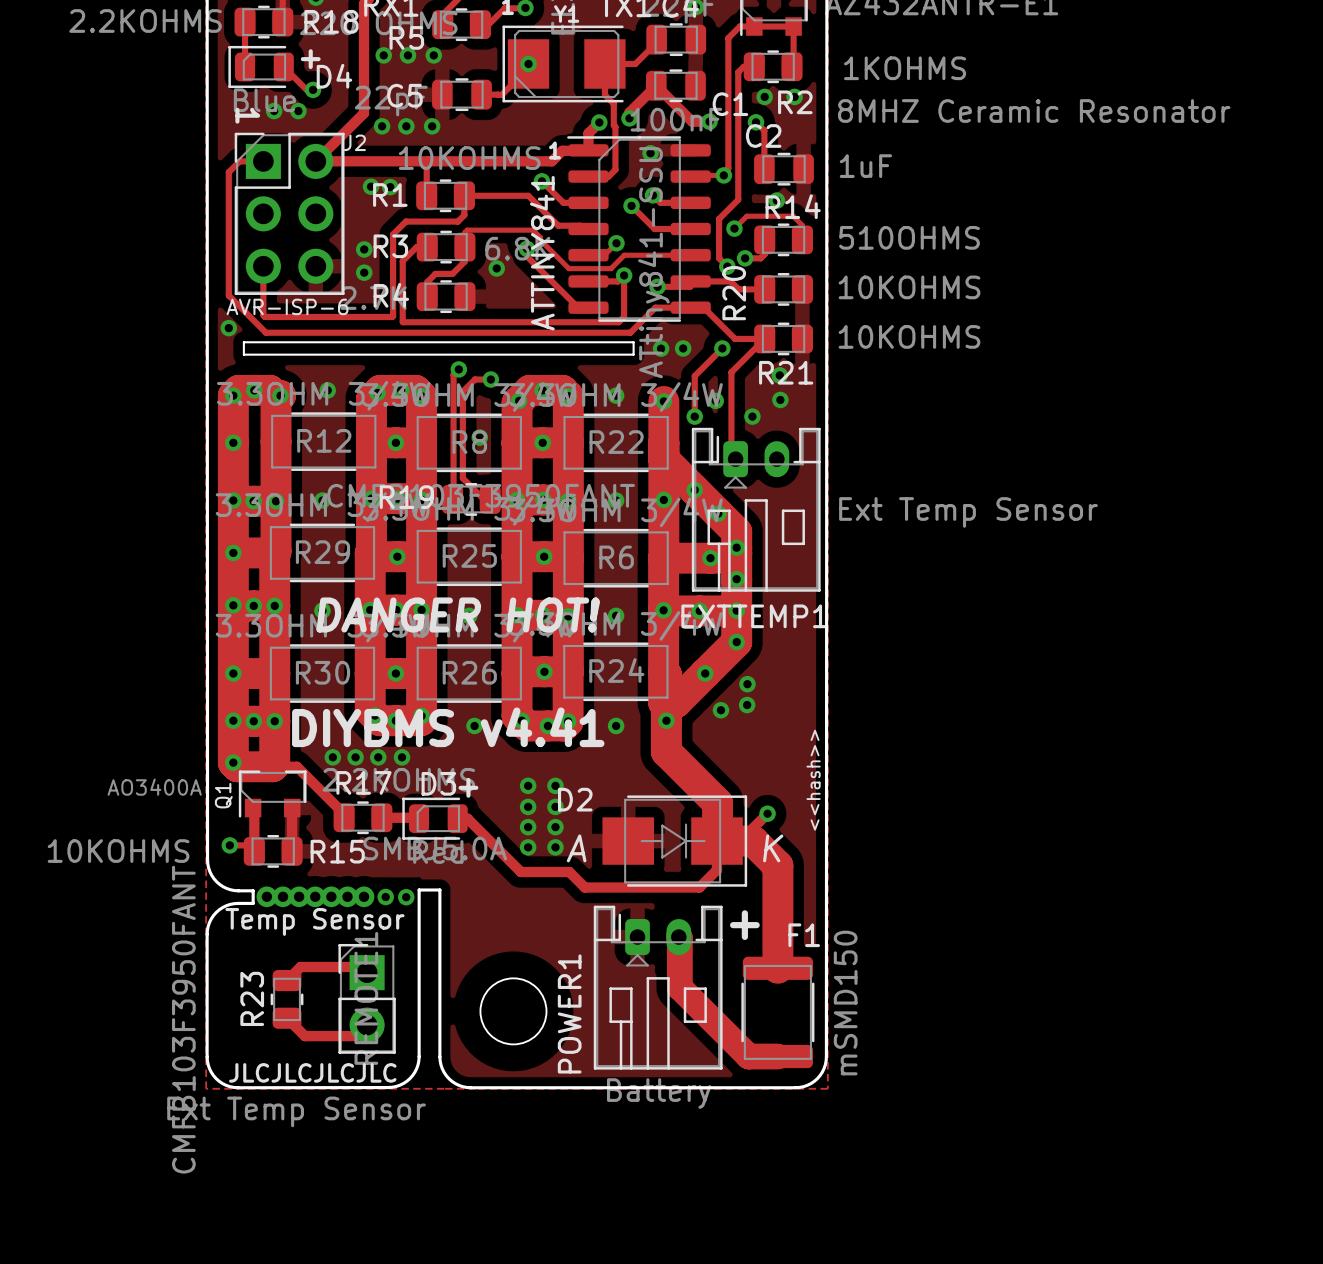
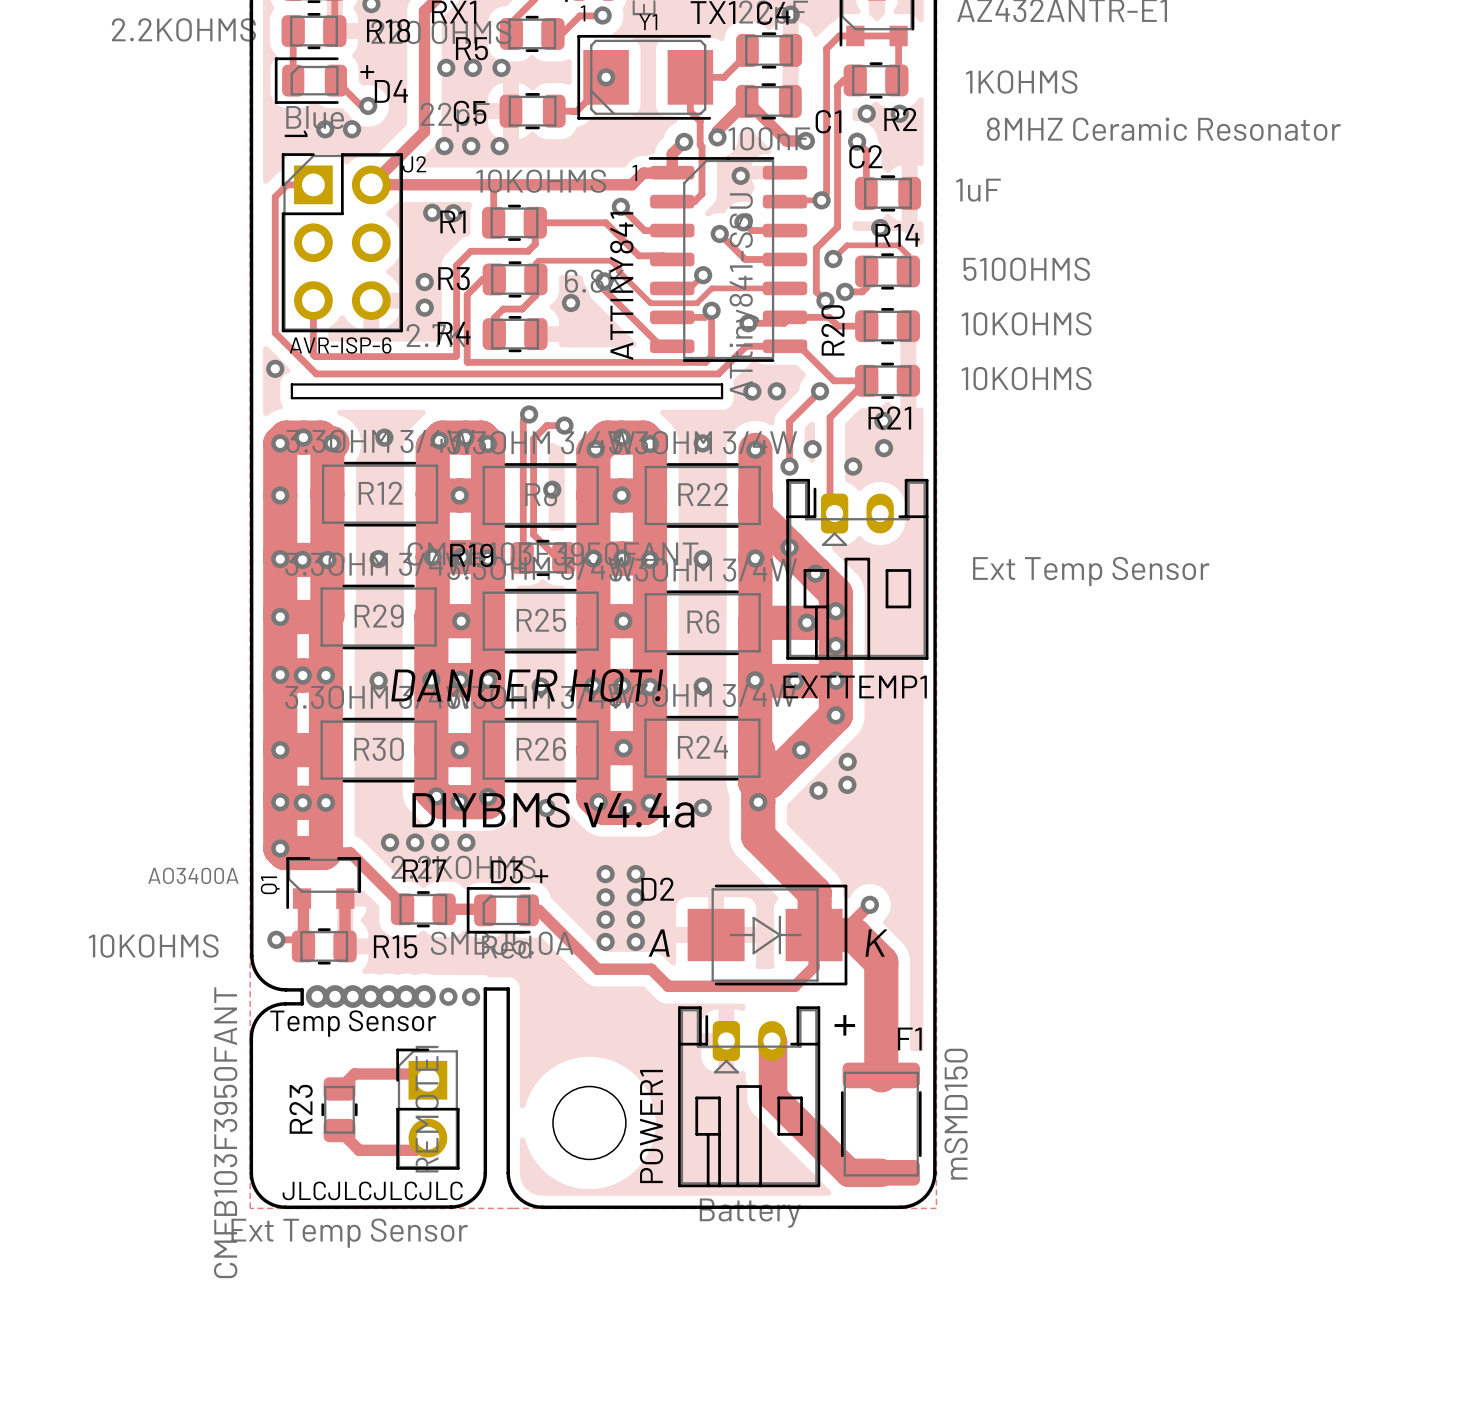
text: DIYBMS v4.41 (448, 727) -> DIYBMS v4.4a (553, 810)
text: <<hash>> (813, 780) -> none

